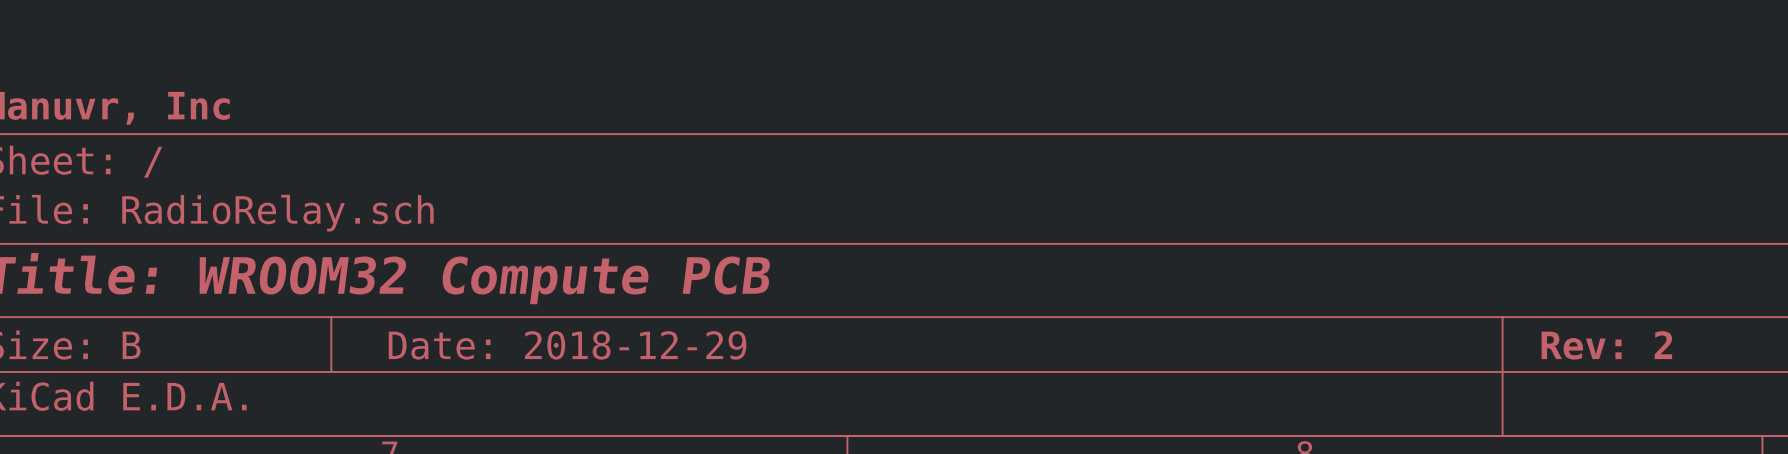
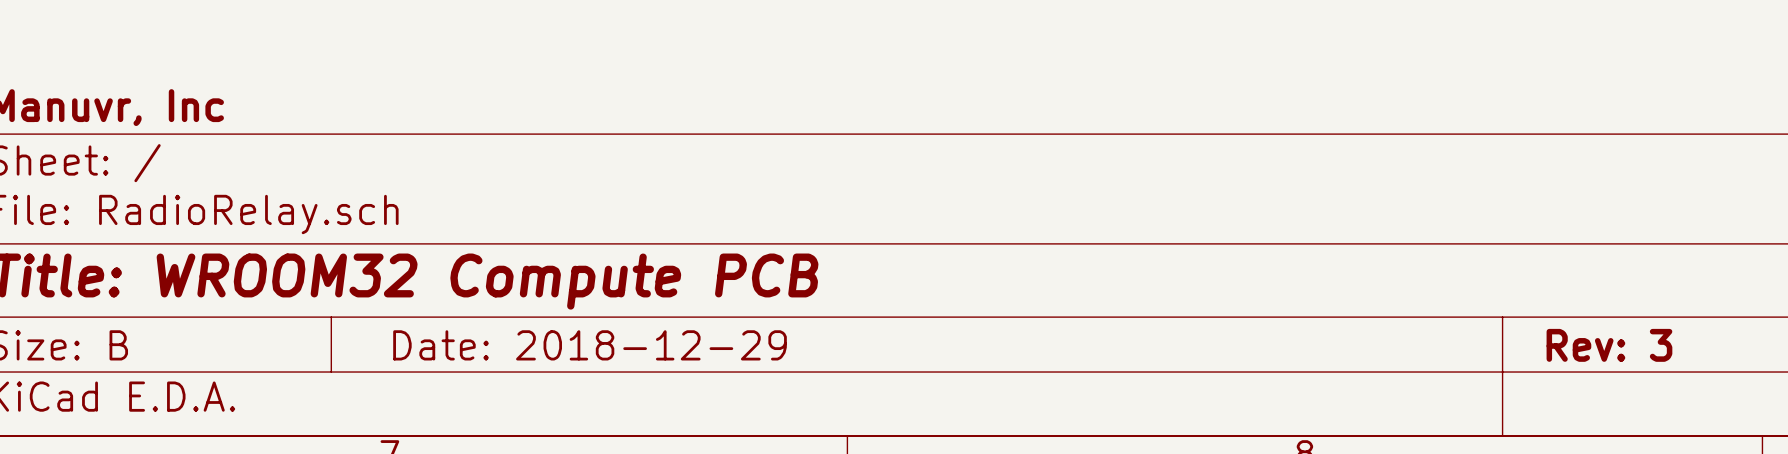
title block: Rev: 2 (1606, 345) -> Rev: 3 (1609, 345)

